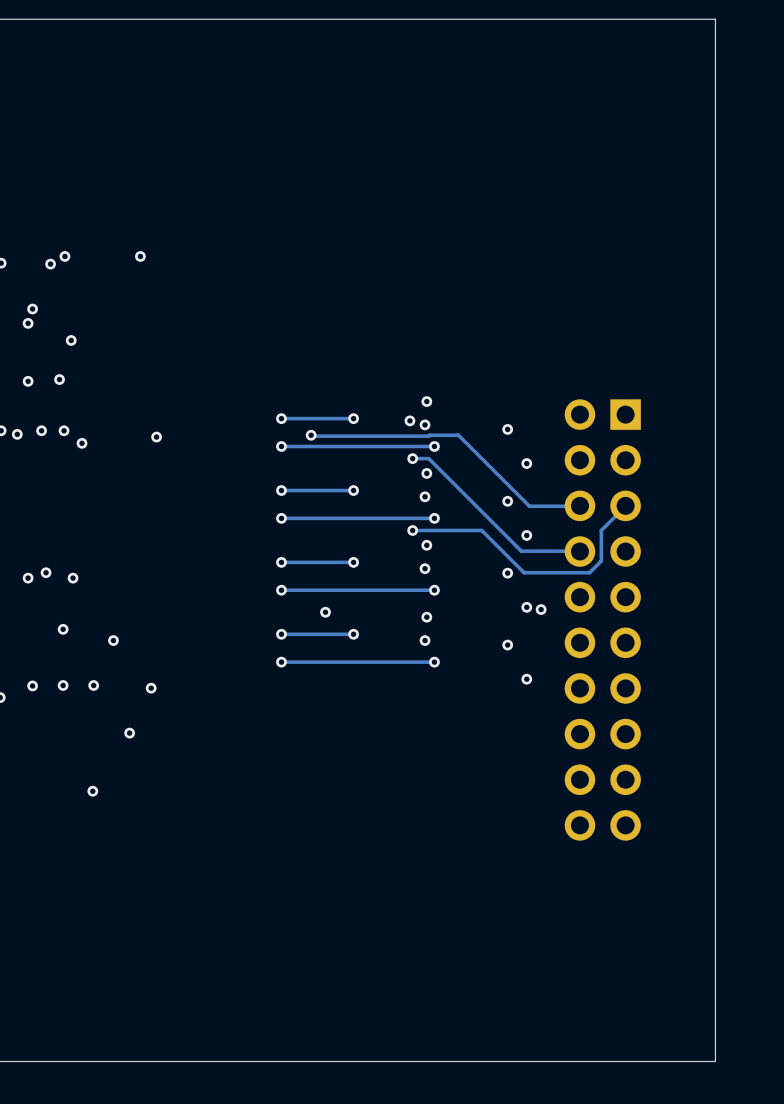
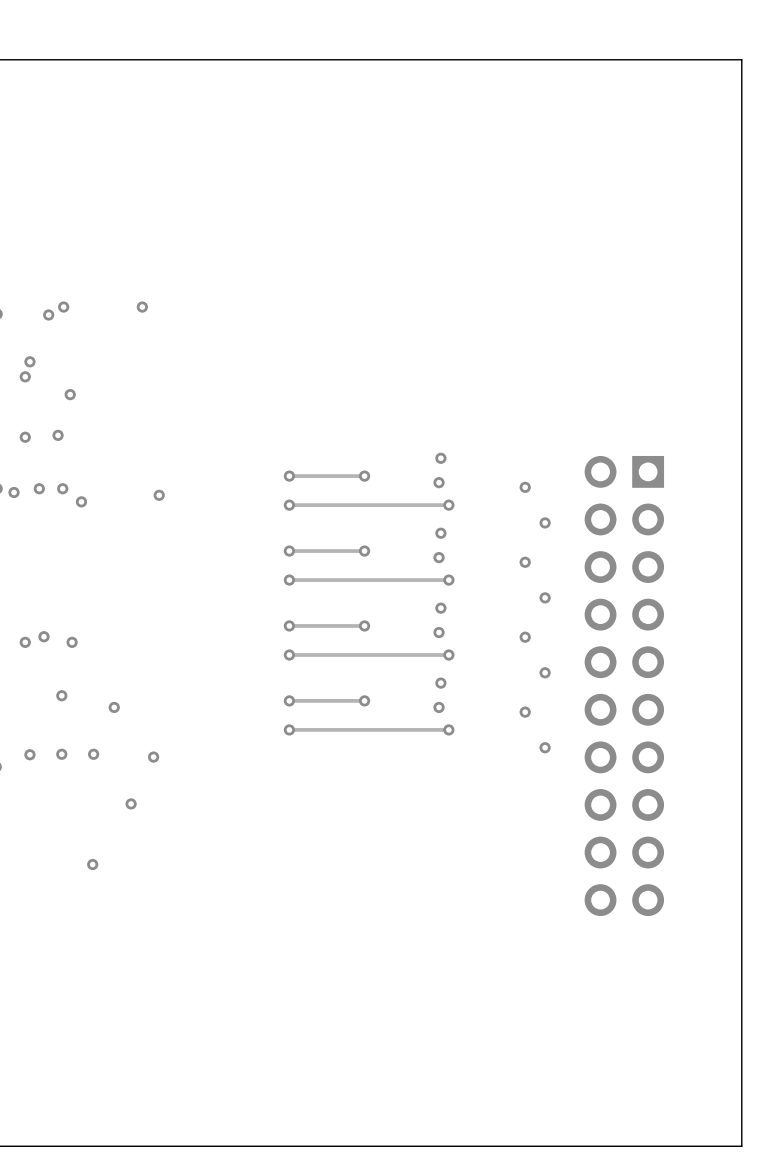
via: (409, 420) -> none
track: (311, 435) (458, 435) (529, 506) (579, 505) -> none
via: (311, 435) -> none
track: (412, 458) (428, 458) (521, 551) (579, 551) -> none
via: (412, 458) -> none
track: (625, 506) (601, 530) (601, 561) (589, 572) (524, 572) (481, 530) (412, 530) -> none
via: (412, 530) -> none
via: (541, 609) -> none
via: (325, 612) -> none

